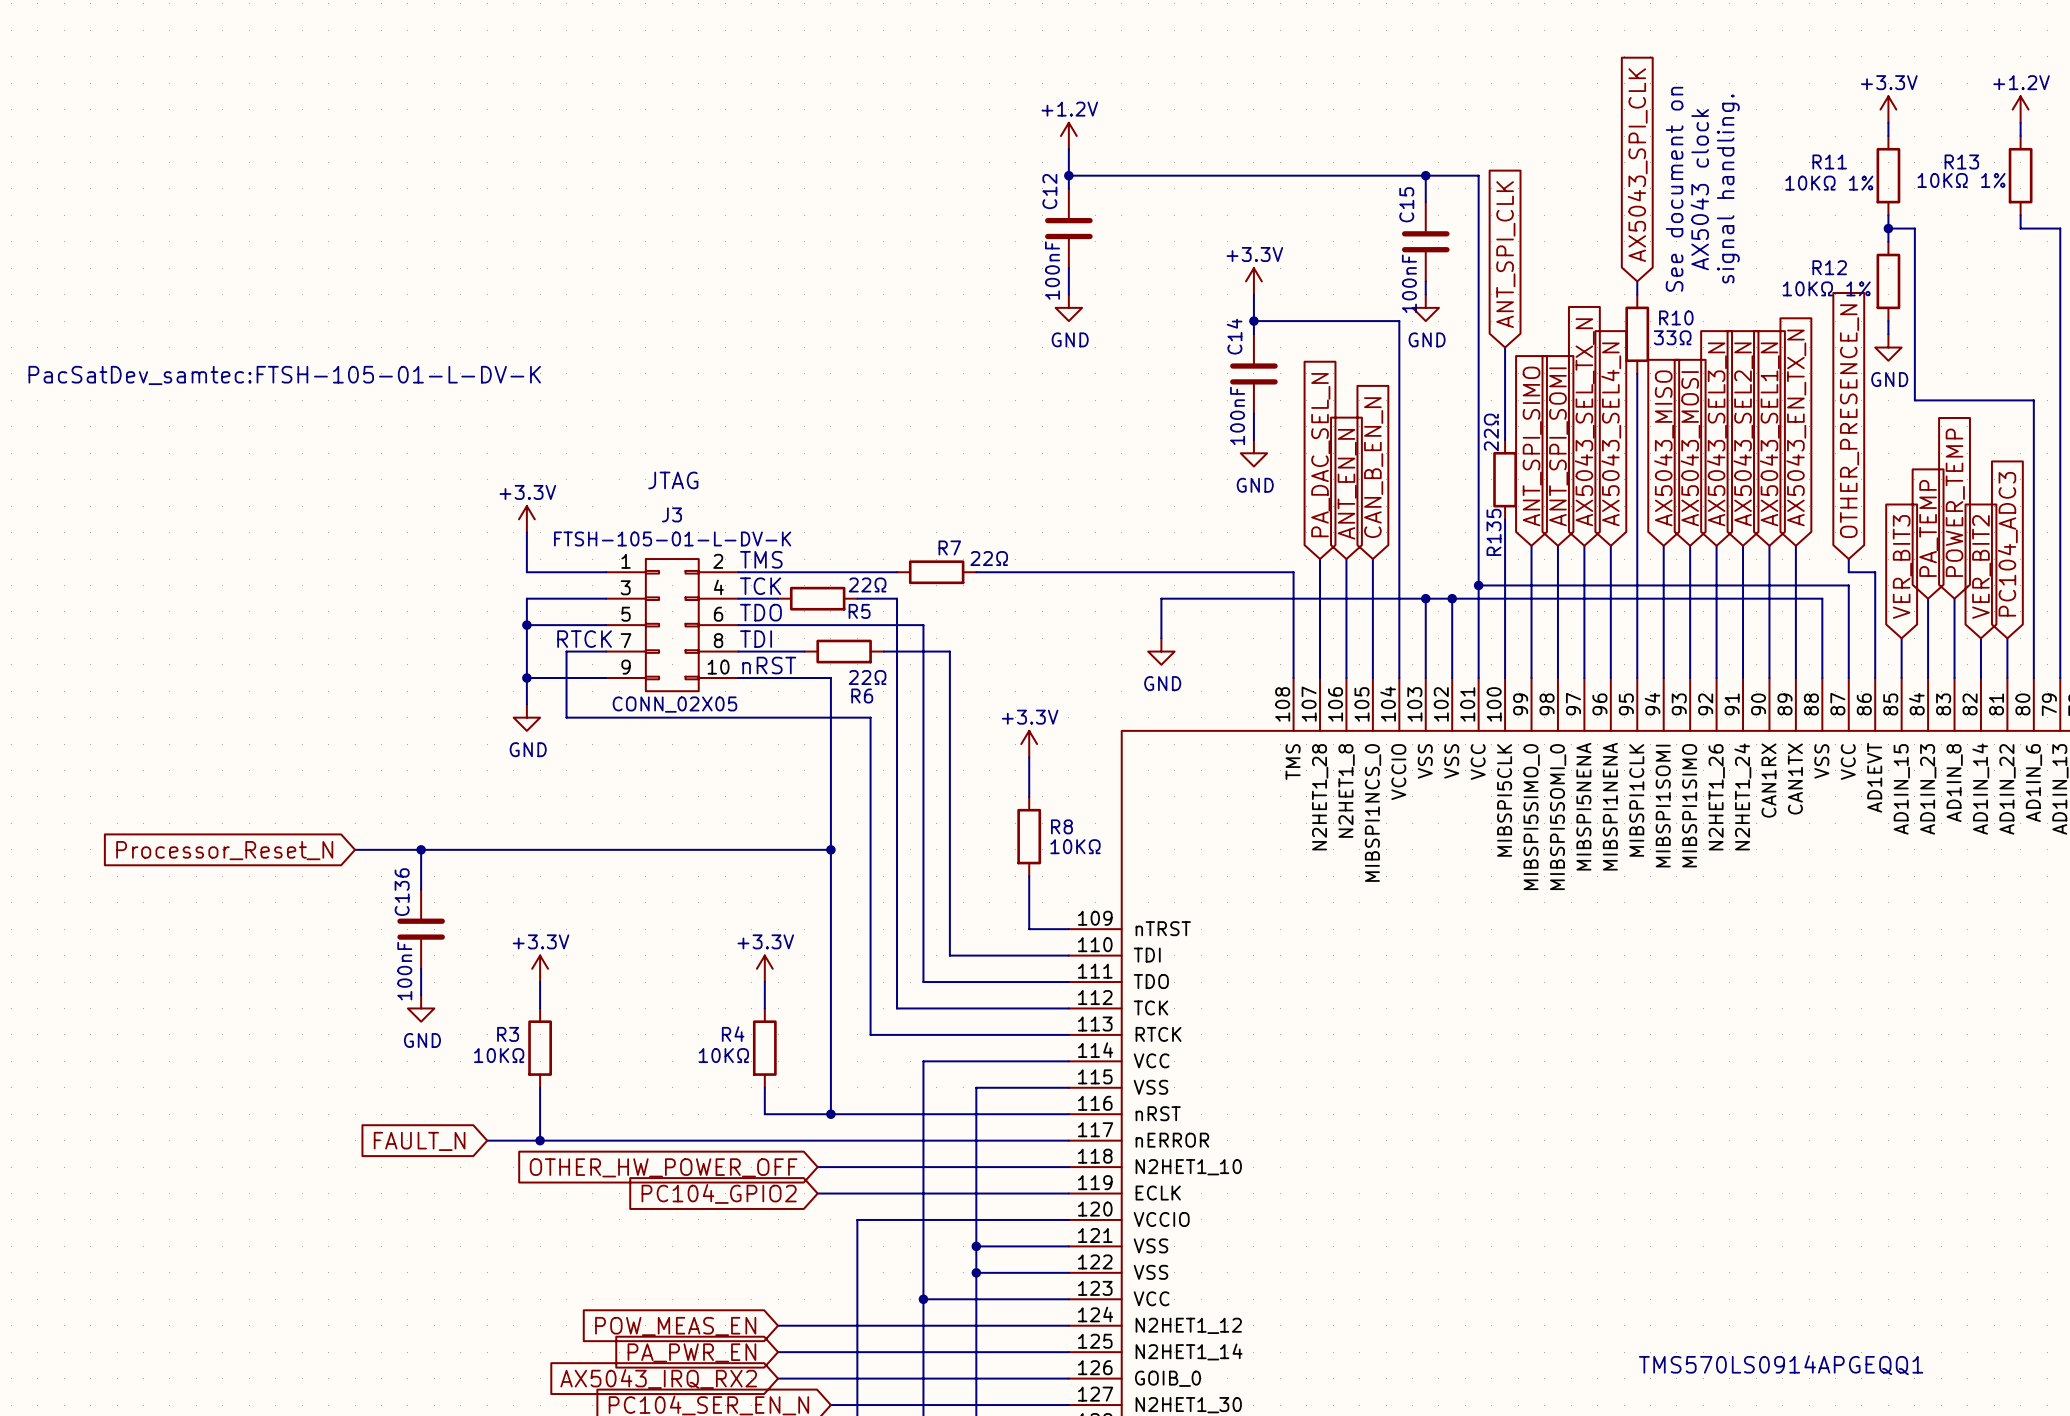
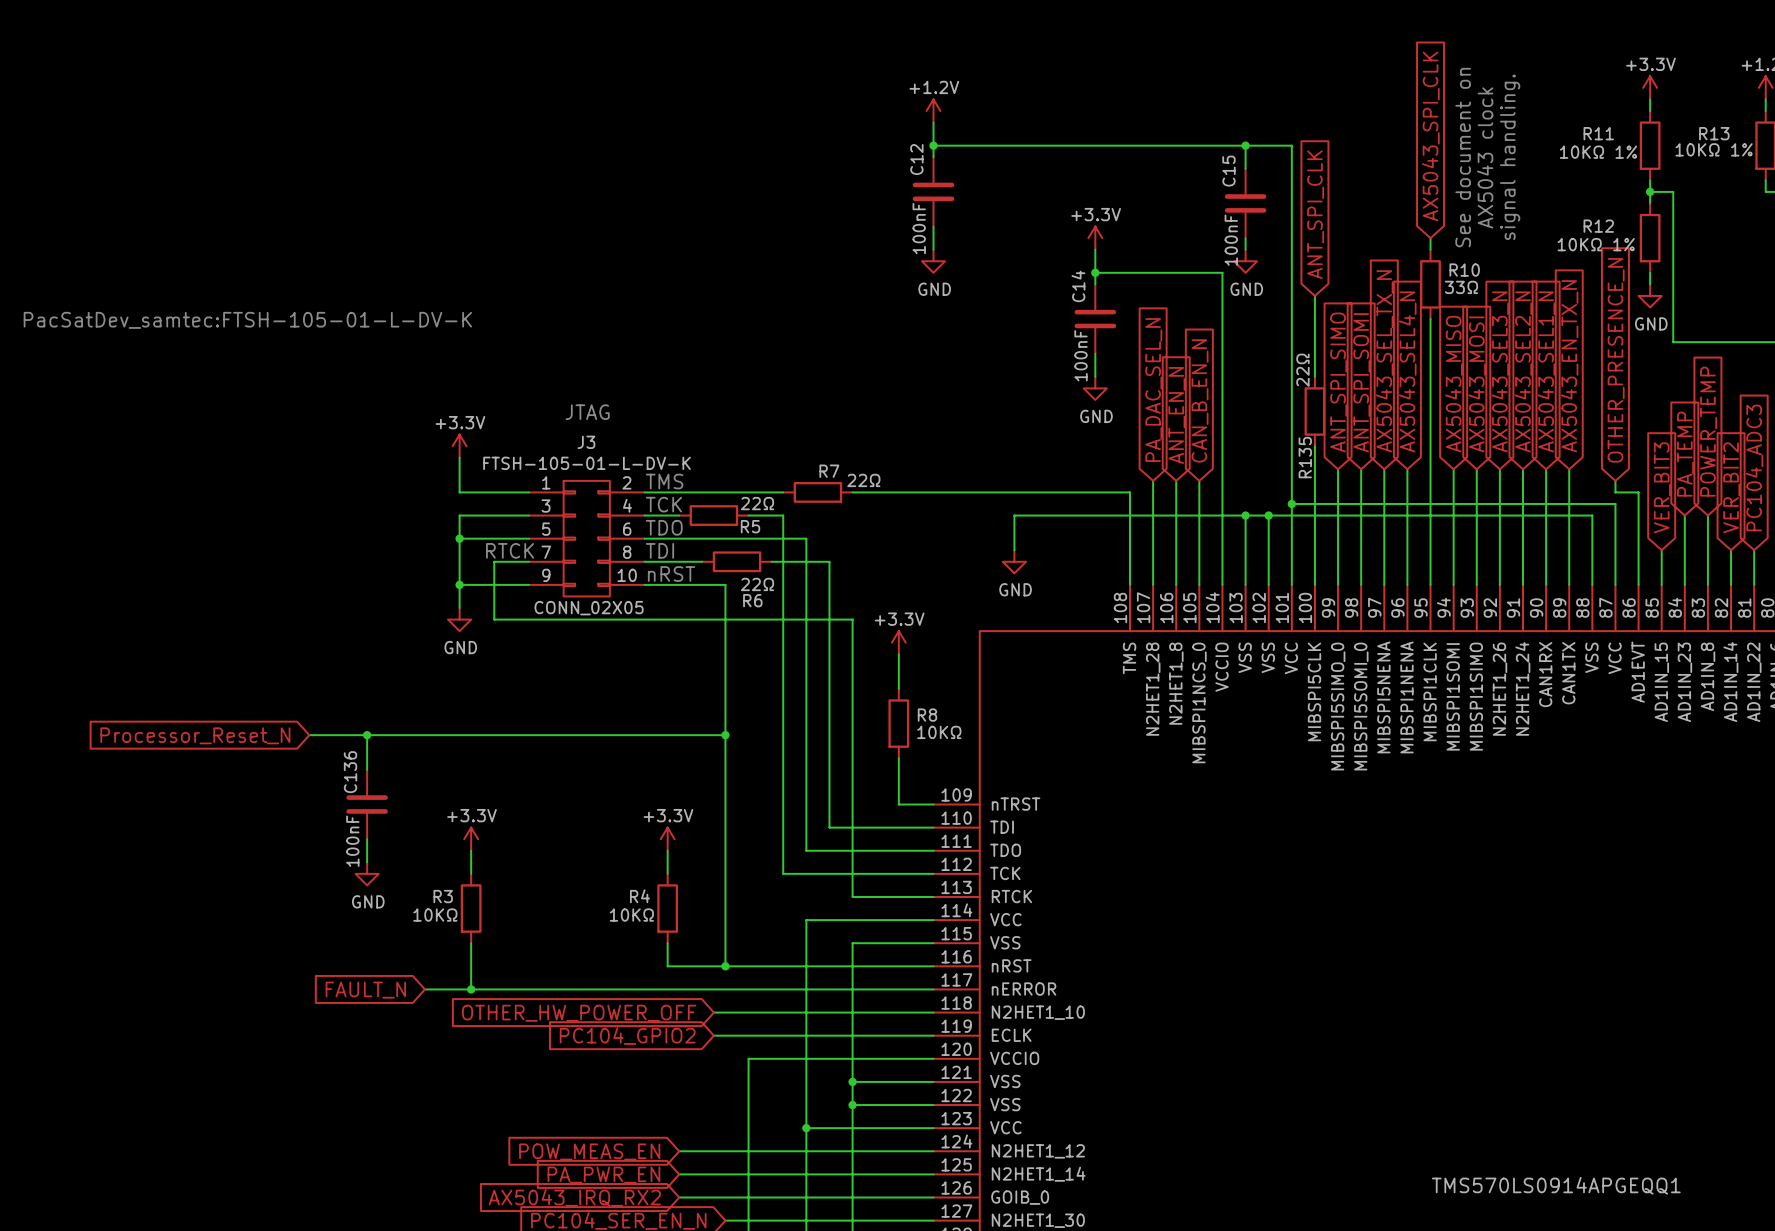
wire: (870, 717) (870, 1034) (976, 1034) -> (760, 619) (852, 619) (852, 896)

